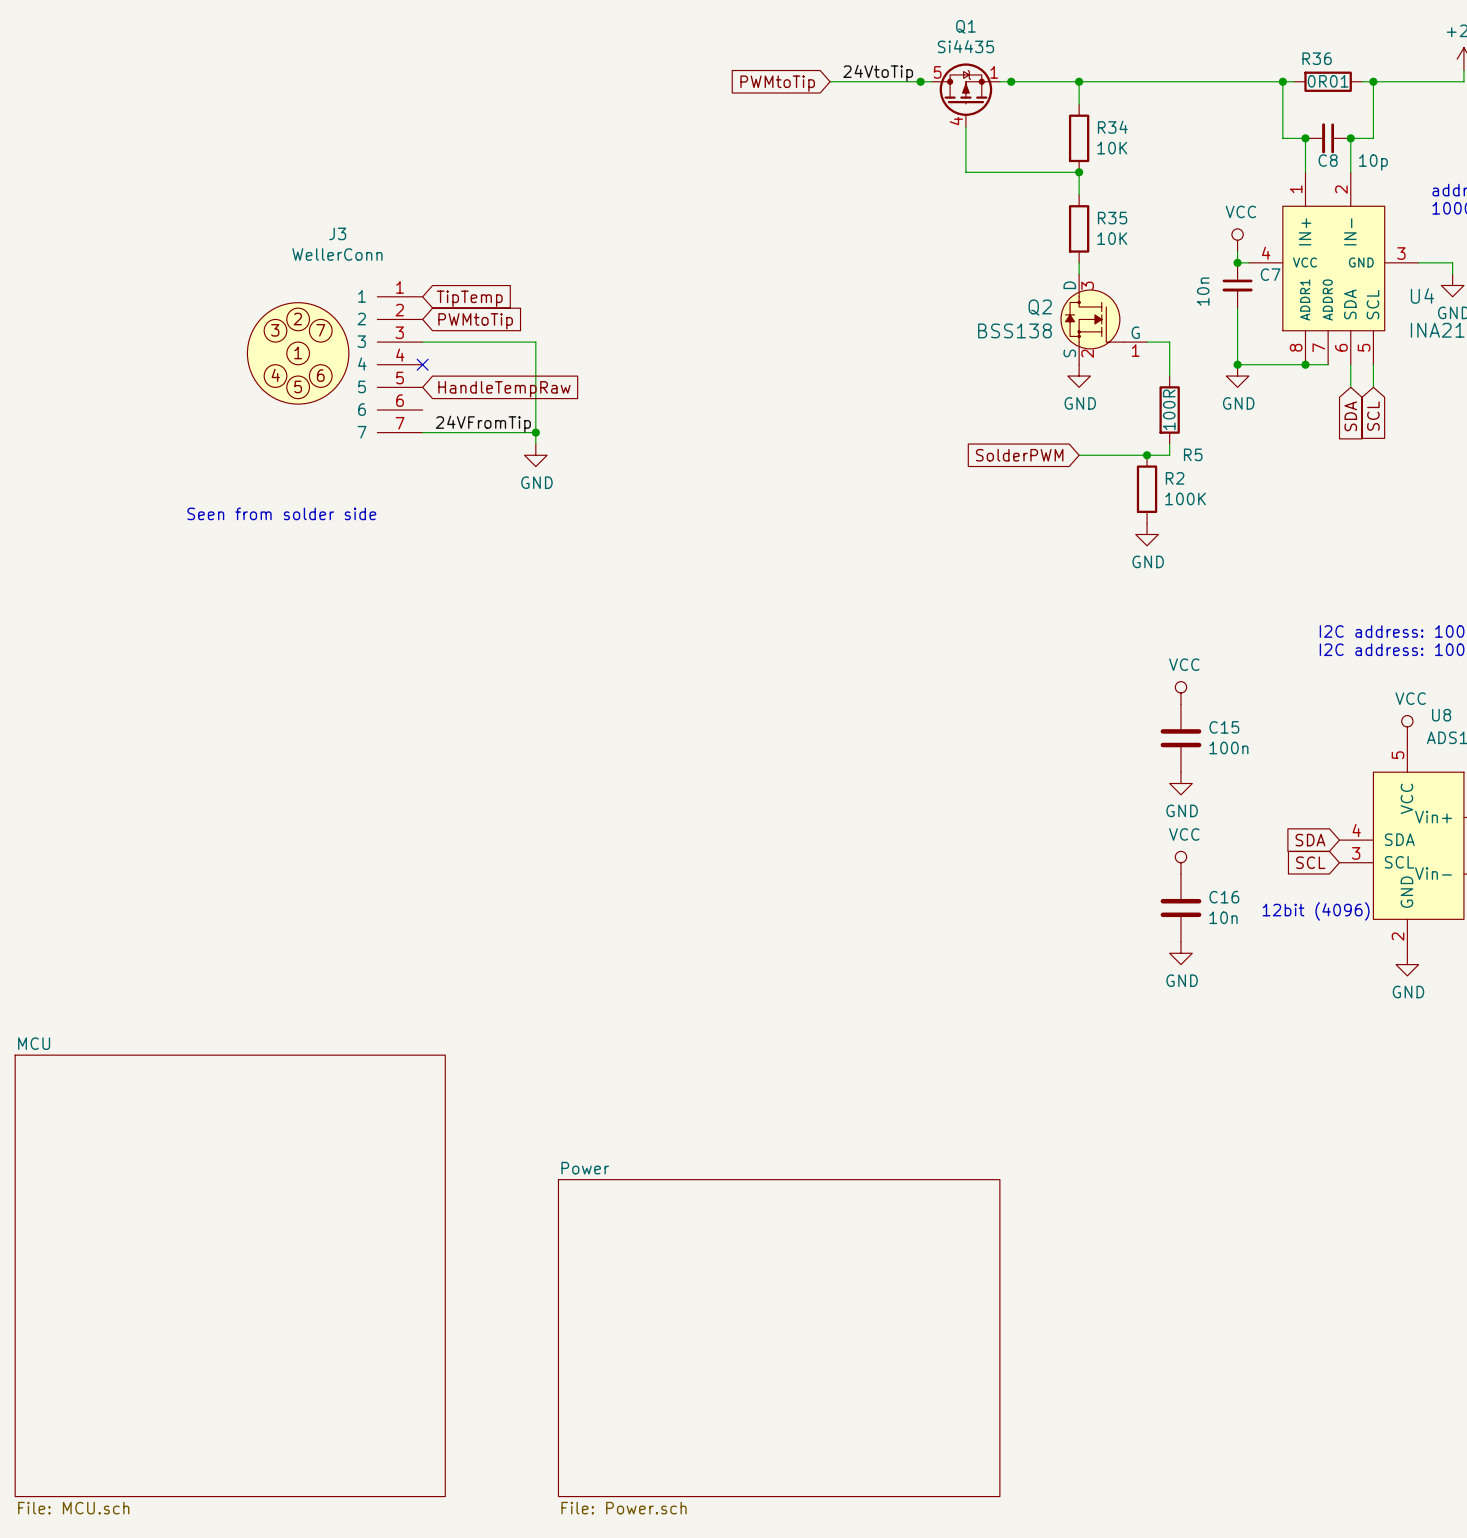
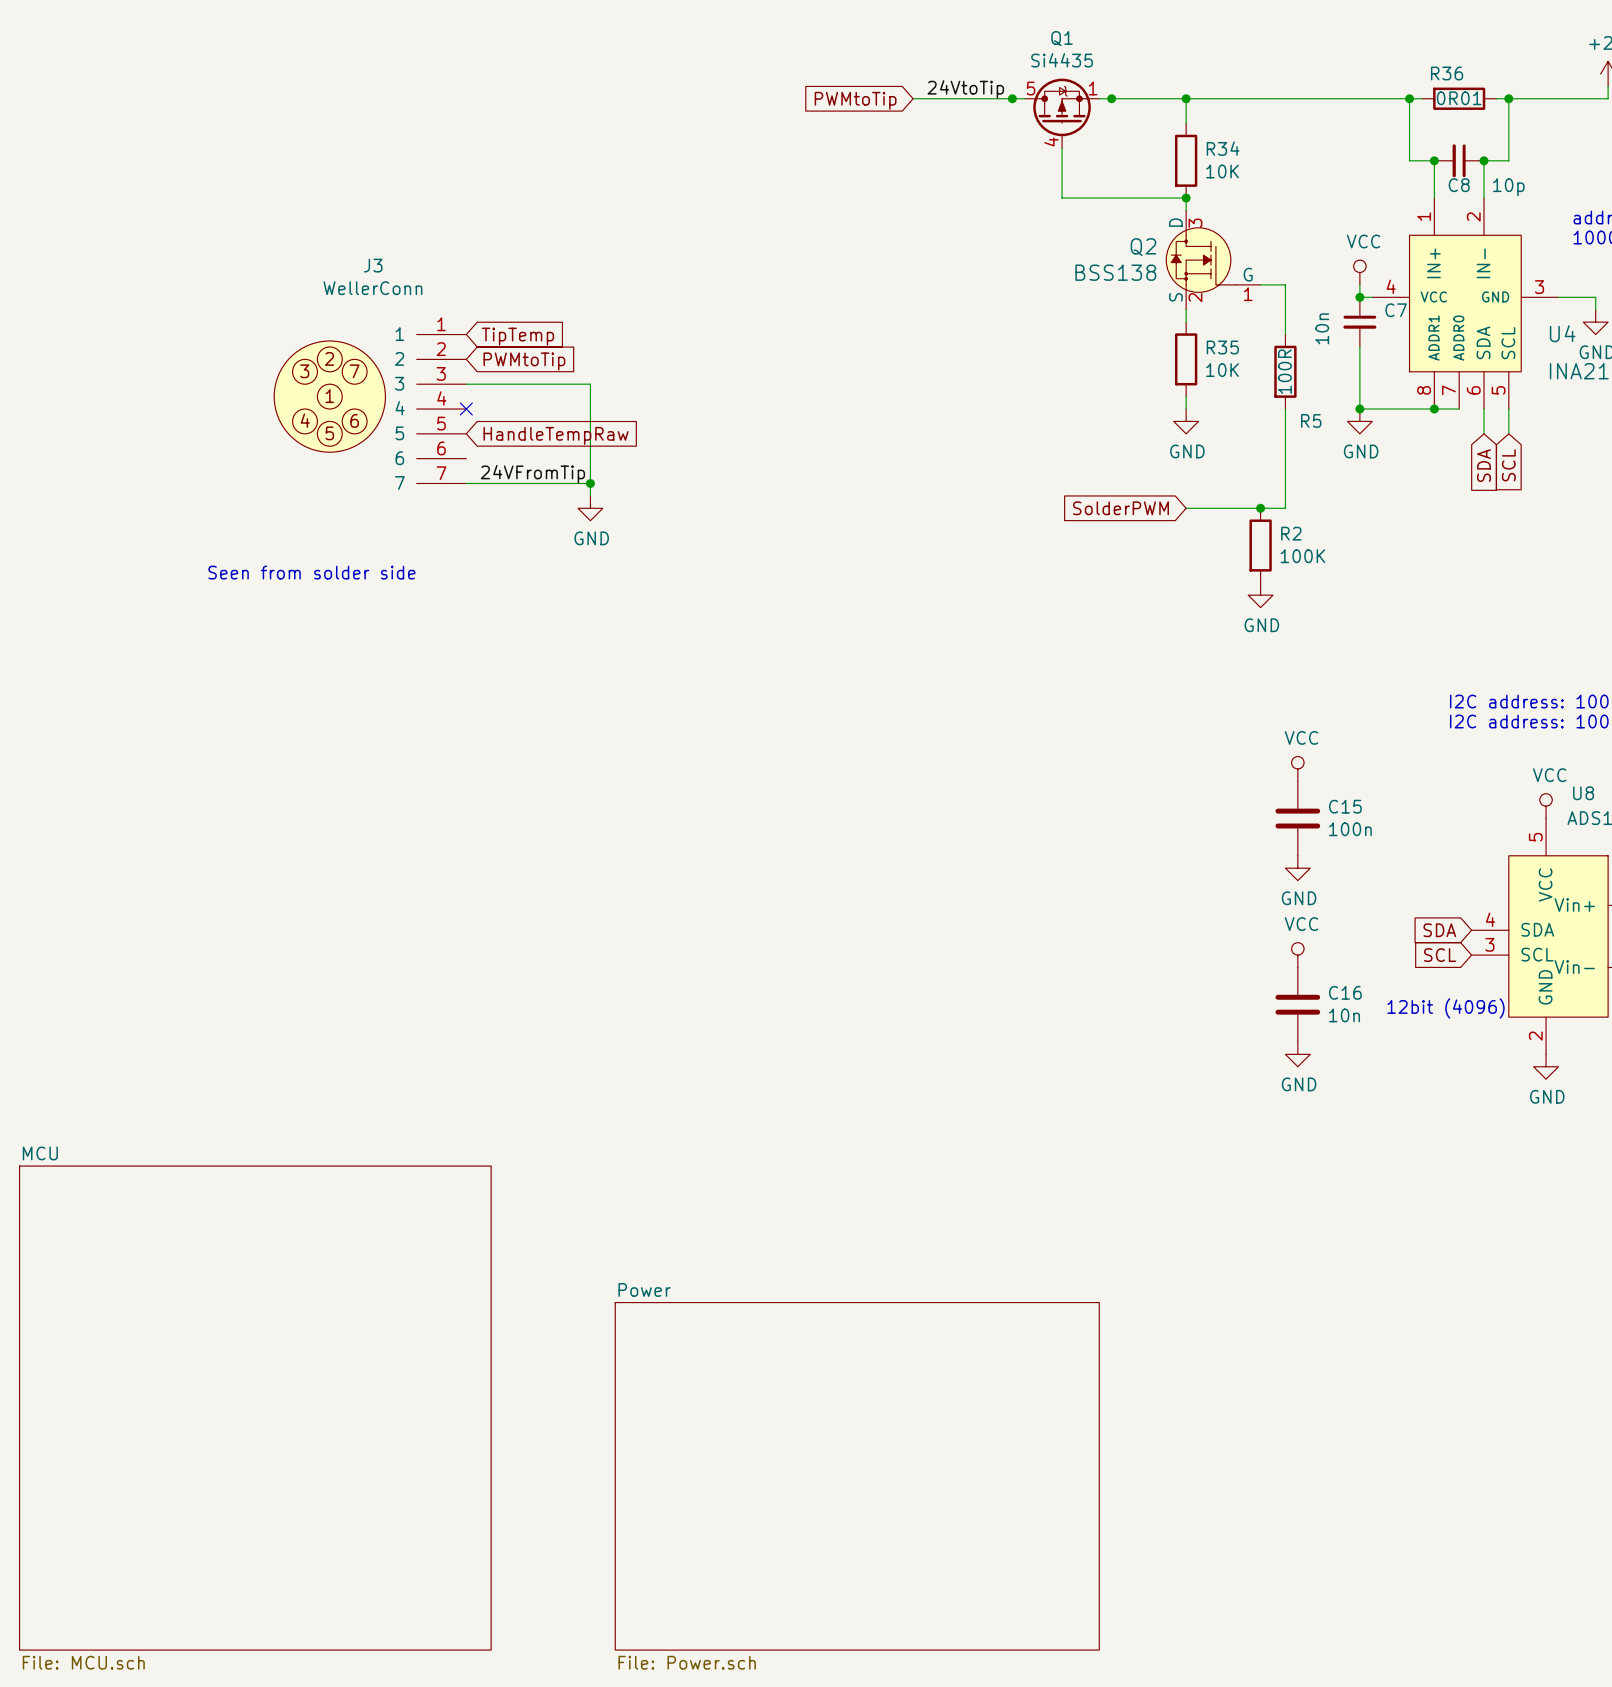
R35 position: (1079, 228) -> (1186, 359)
wire: none -> (1260, 284) (1285, 284) (1285, 334)
Q2 position: (1104, 319) -> (1213, 260)
wire: (1147, 342) (1169, 342) (1169, 364) -> none
R5 position: (1169, 409) -> (1285, 371)

